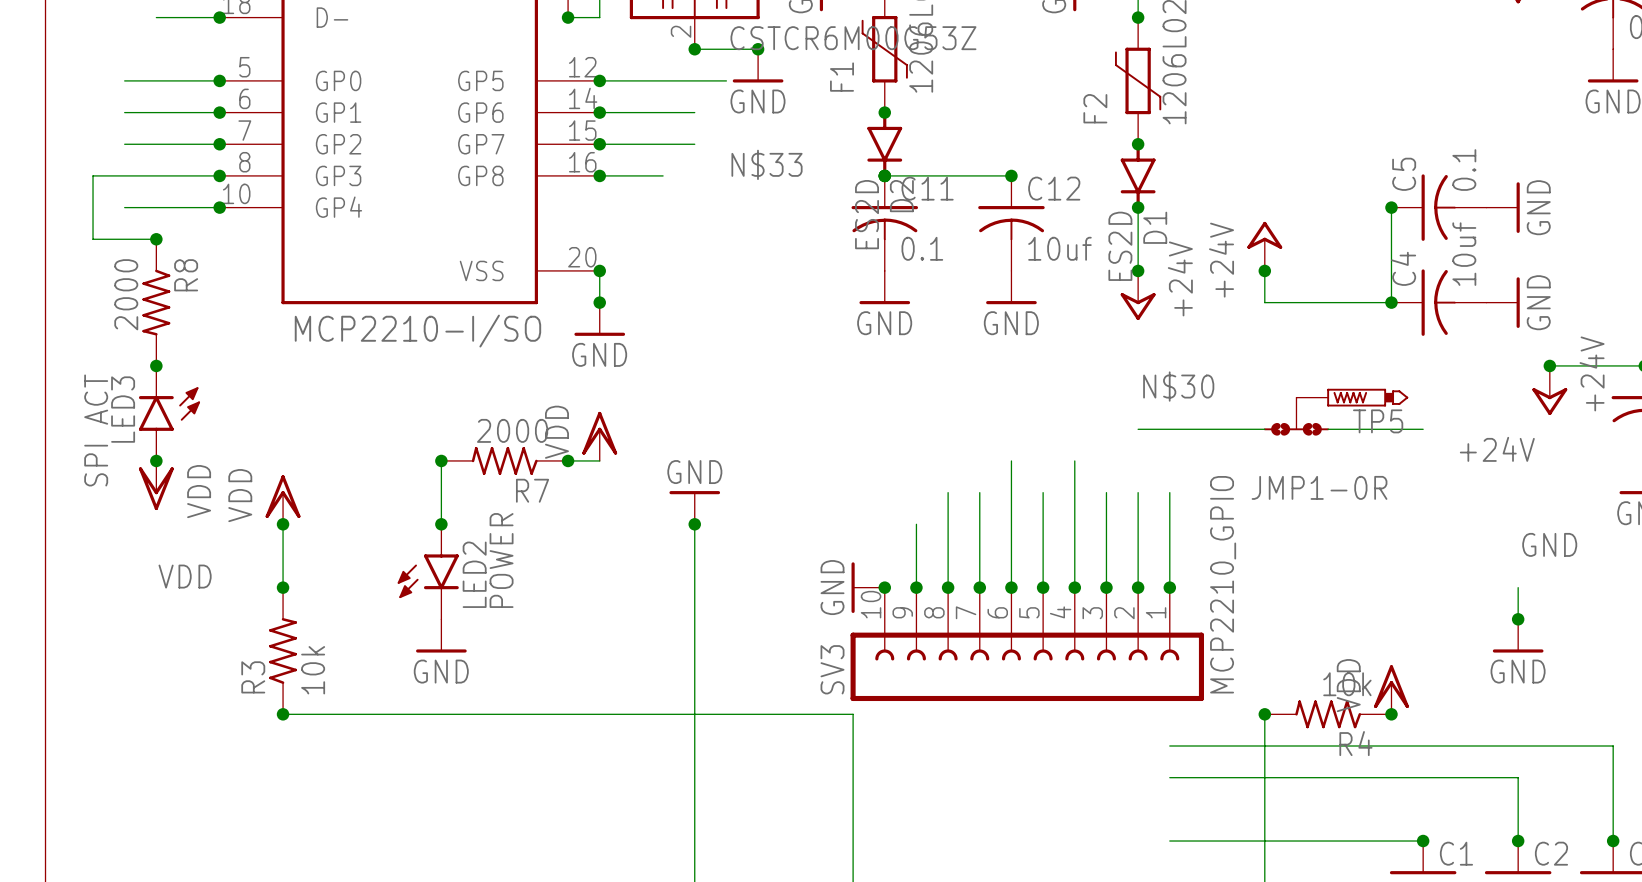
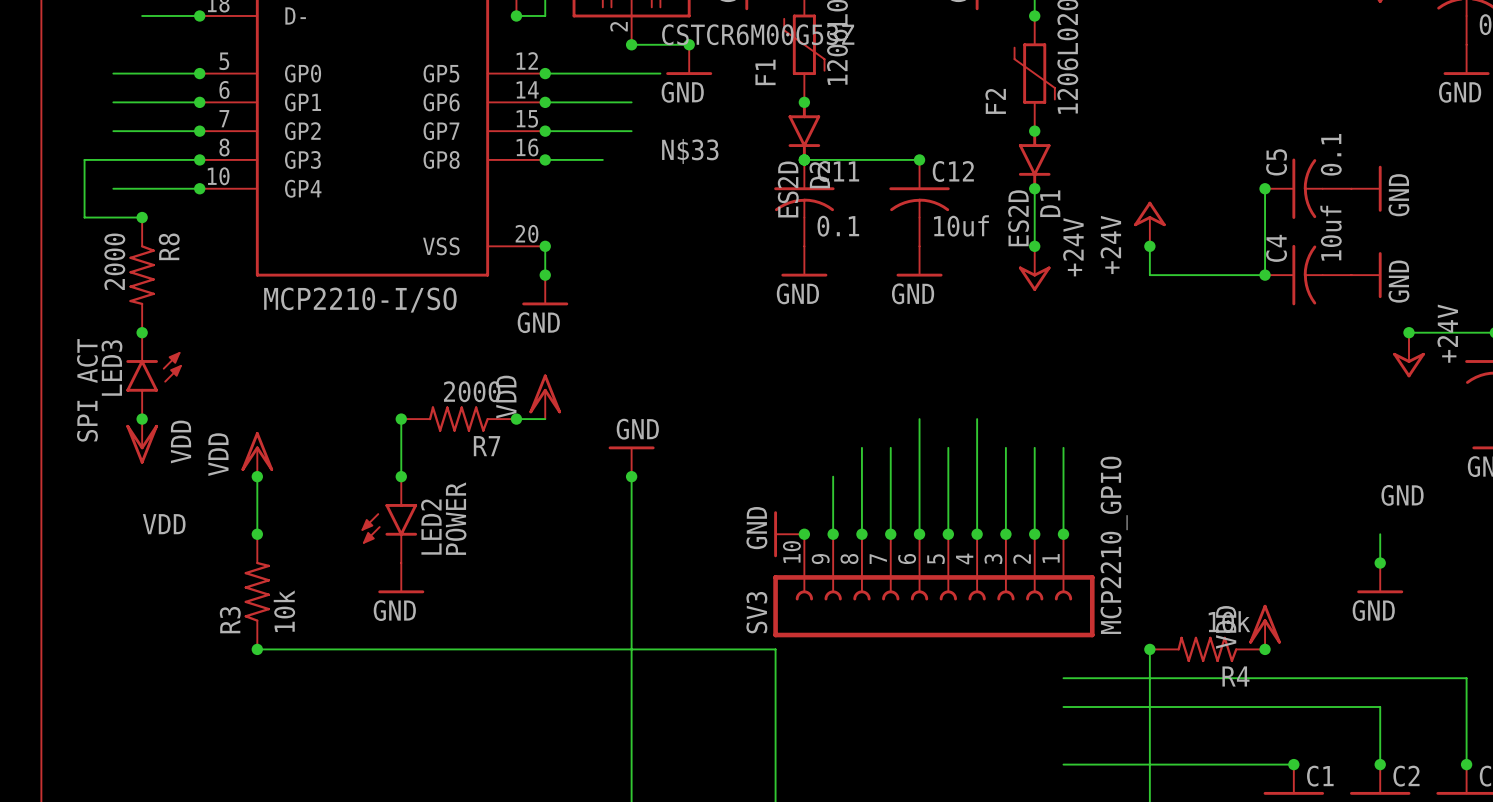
label: N$30 (1178, 386) -> none
TP5: (1352, 397) -> none
JMP1-0R: (1296, 416) -> none
wire: (1138, 429) (1264, 429) -> none
wire: (1328, 429) (1423, 429) -> none
label: +24V (1497, 449) -> none

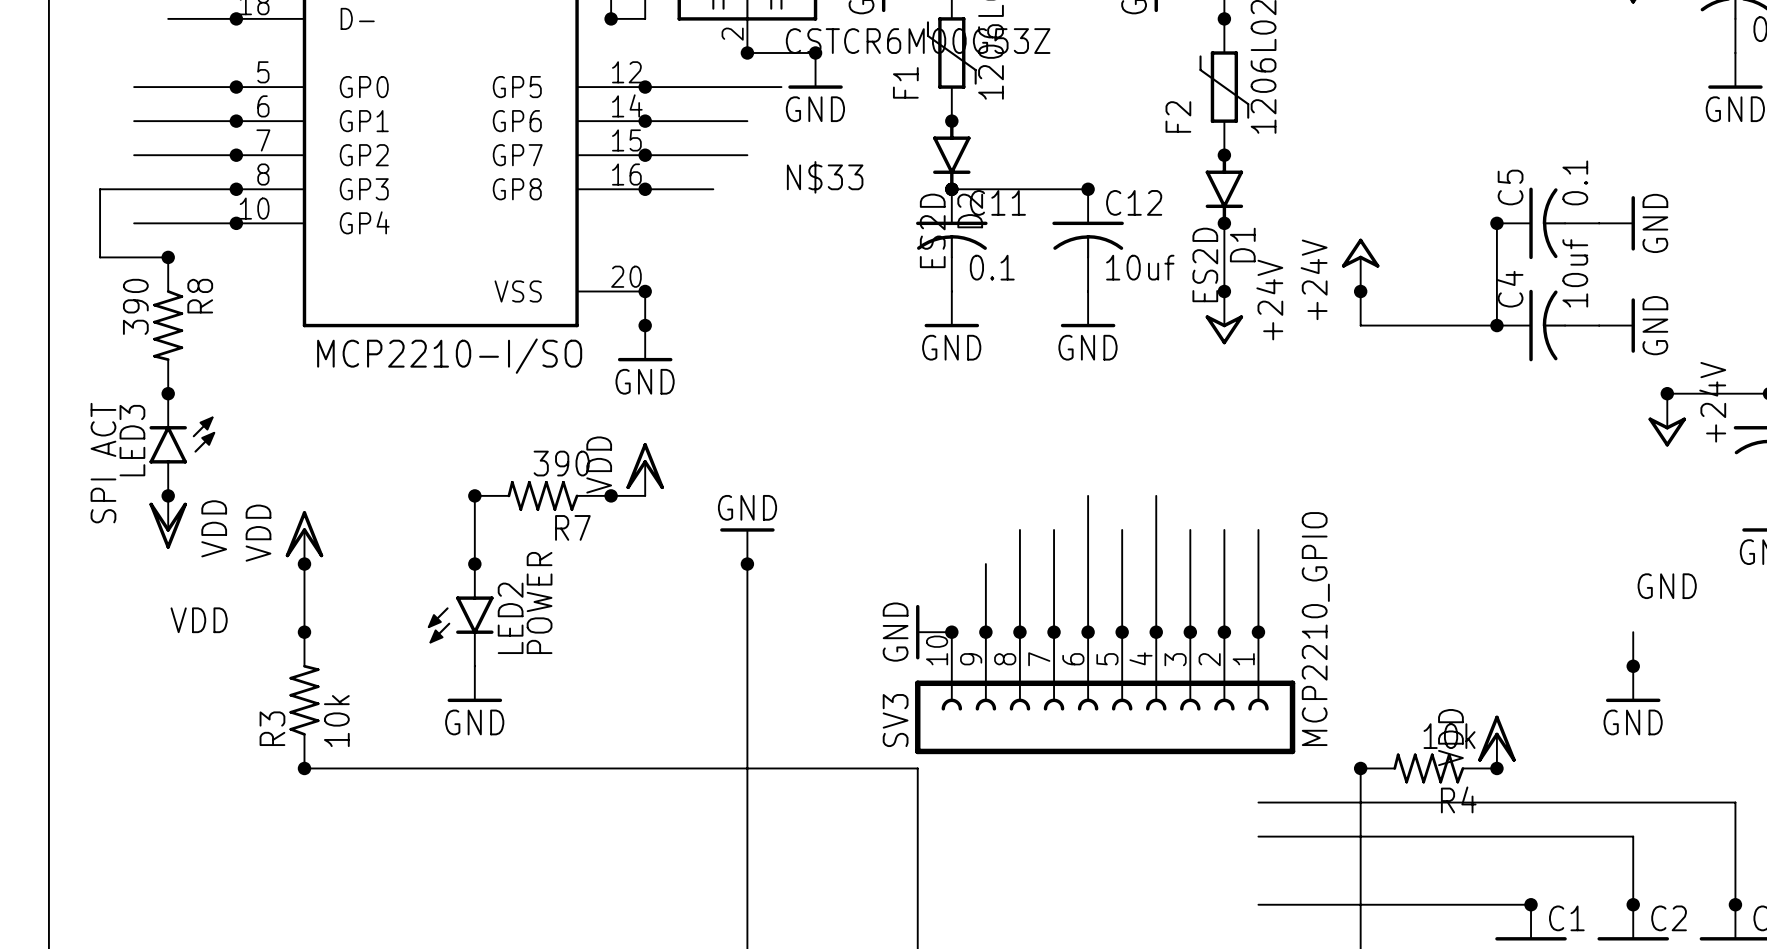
R8 value: 2000 (114, 261) -> 390 (135, 306)
R7 value: 2000 (472, 391) -> 390 (561, 463)

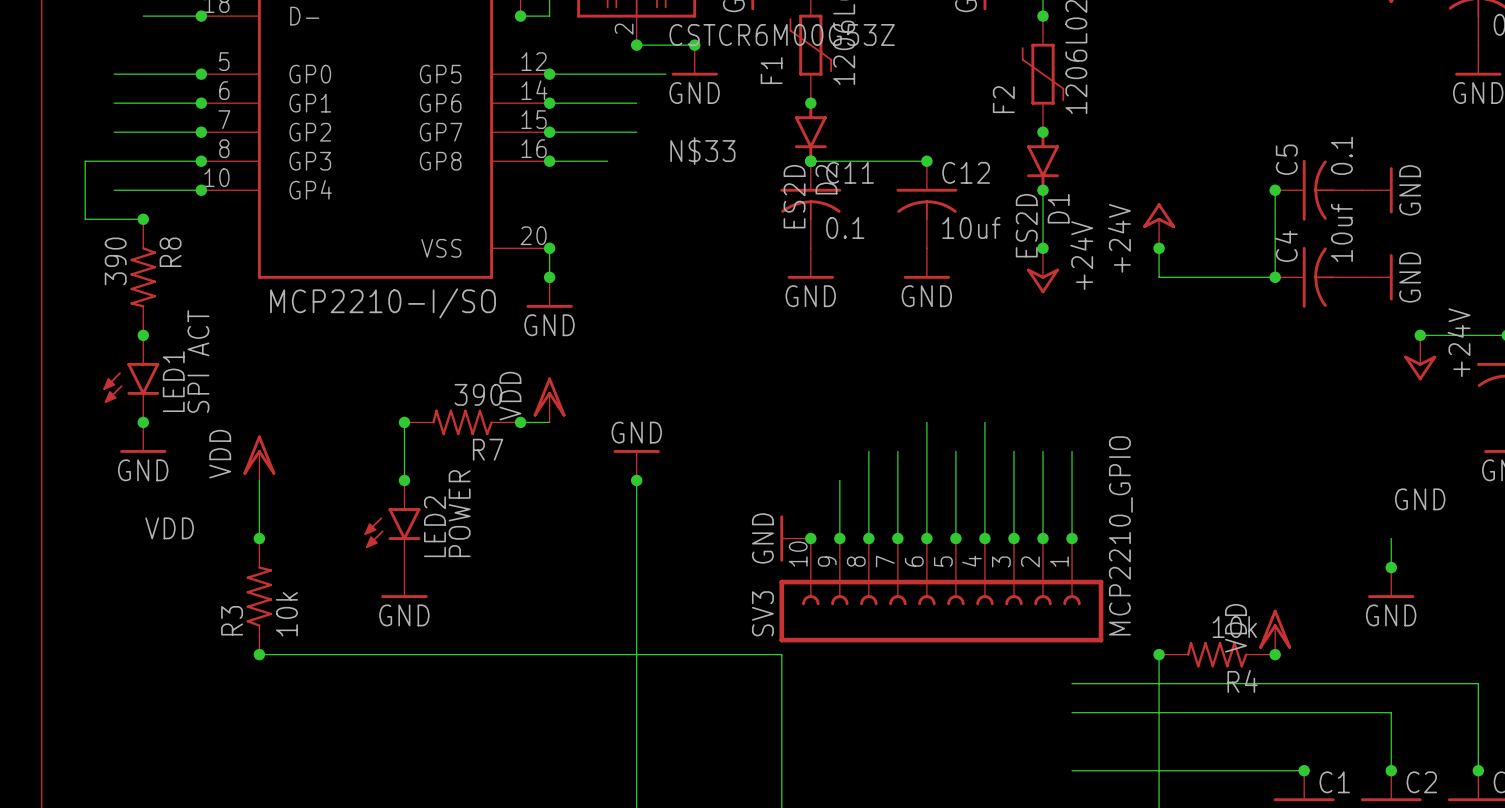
LED1: none -> SPI ACT (131, 378)
LED3: SPI ACT (182, 444) -> none
power symbol: VDD (168, 522) -> GND (143, 437)
junction: (304, 564) -> none

